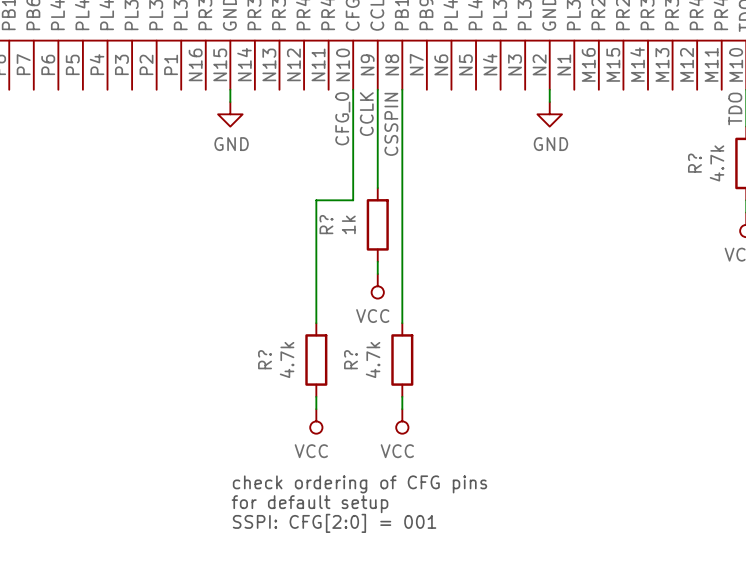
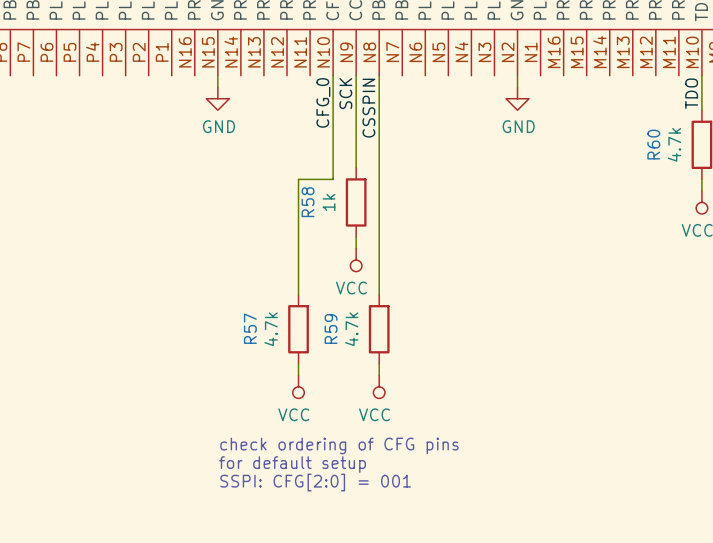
label: CCLK (366, 114) -> SCK (345, 93)
R? name: R? (694, 163) -> R60 (653, 144)
R? name: R? (326, 224) -> R58 (308, 202)
R? name: R? (265, 359) -> R57 (250, 328)
R? name: R? (351, 359) -> R59 (331, 328)

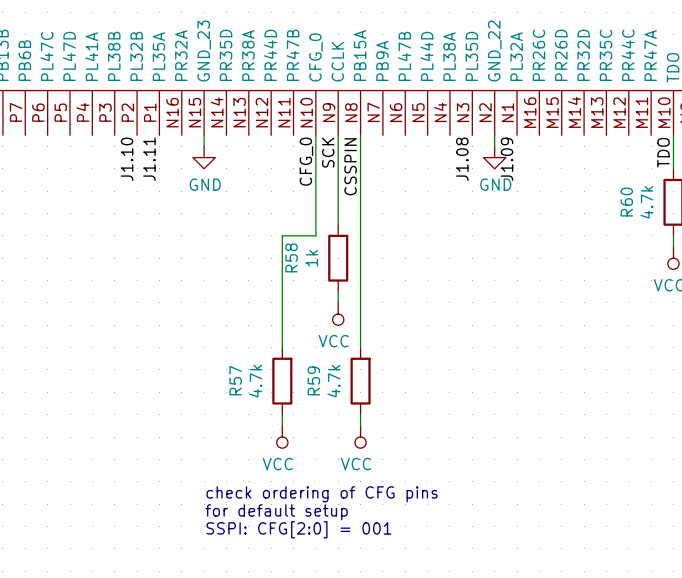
label: none -> J1.10 (127, 159)
label: none -> J1.11 (149, 159)
label: none -> J1.08 (462, 159)
label: none -> J1.09 (507, 159)

